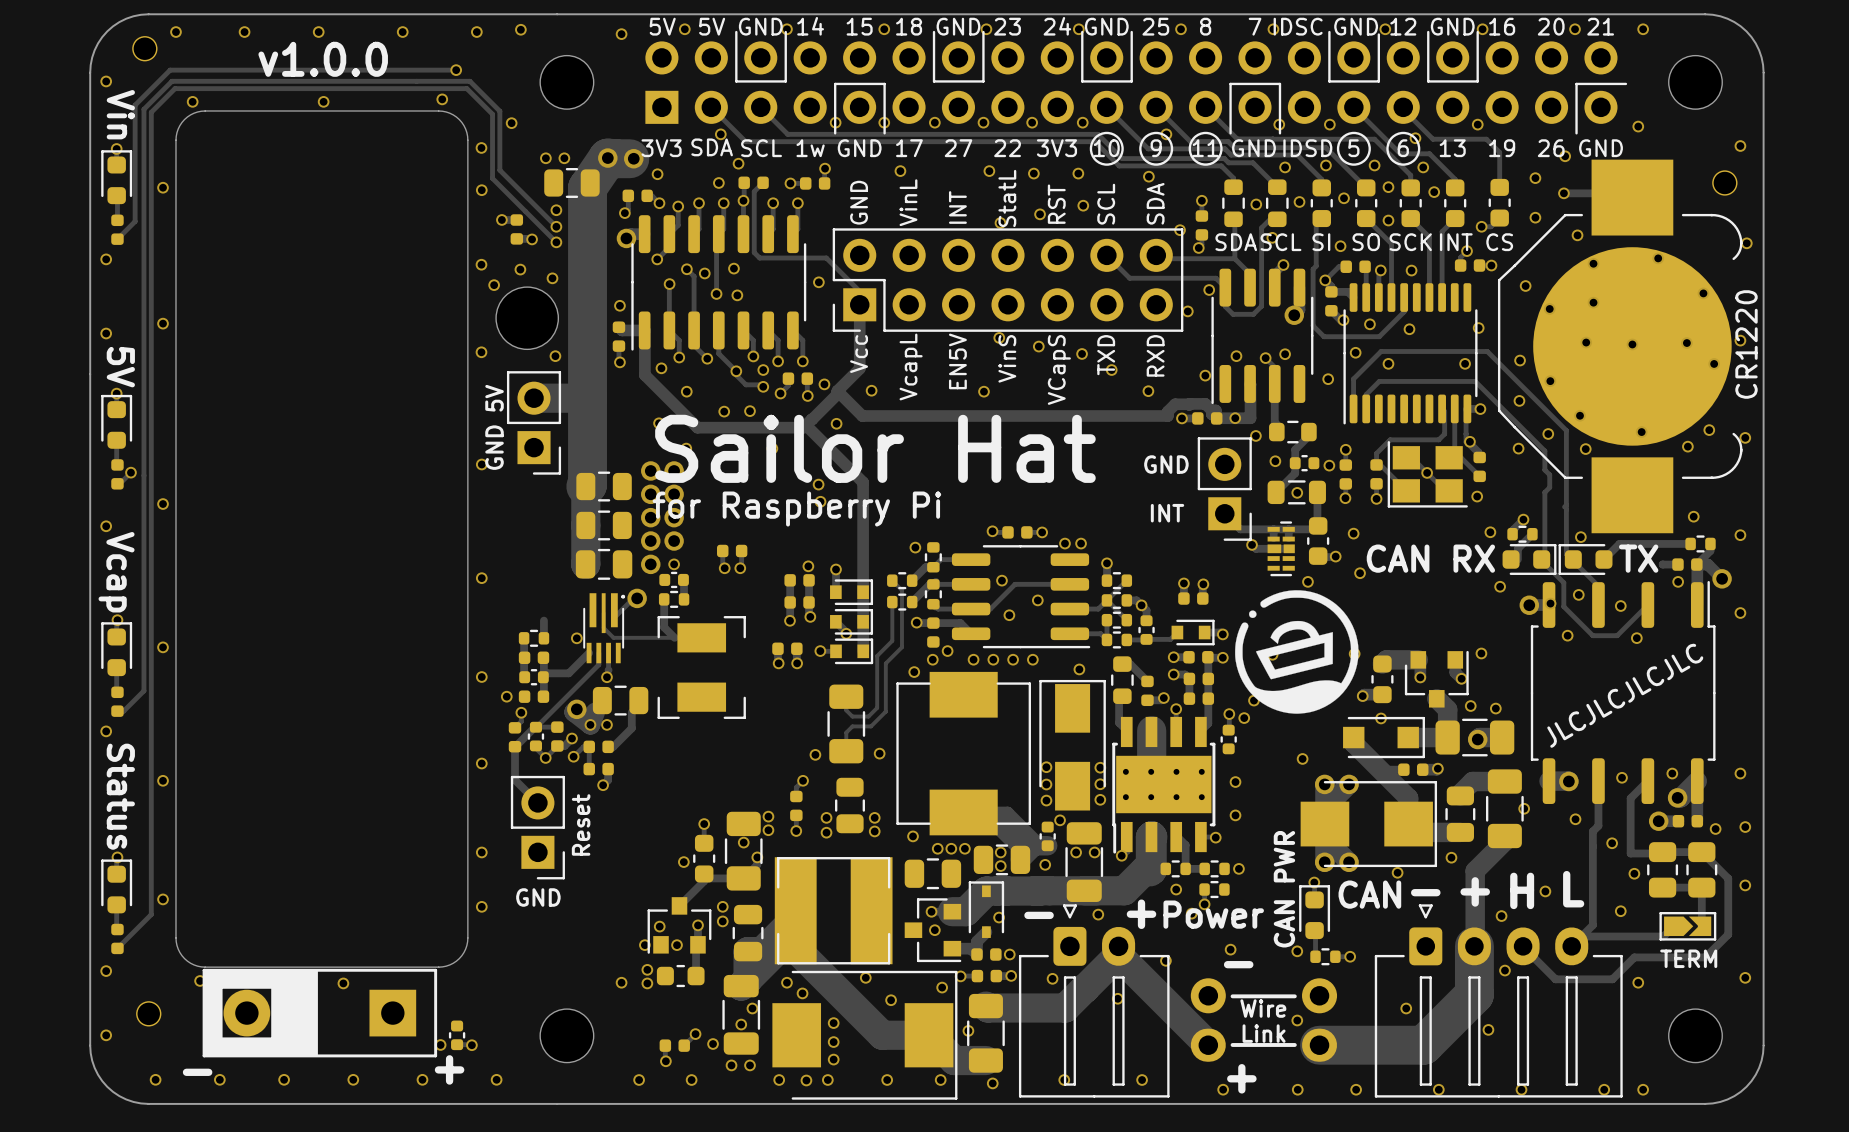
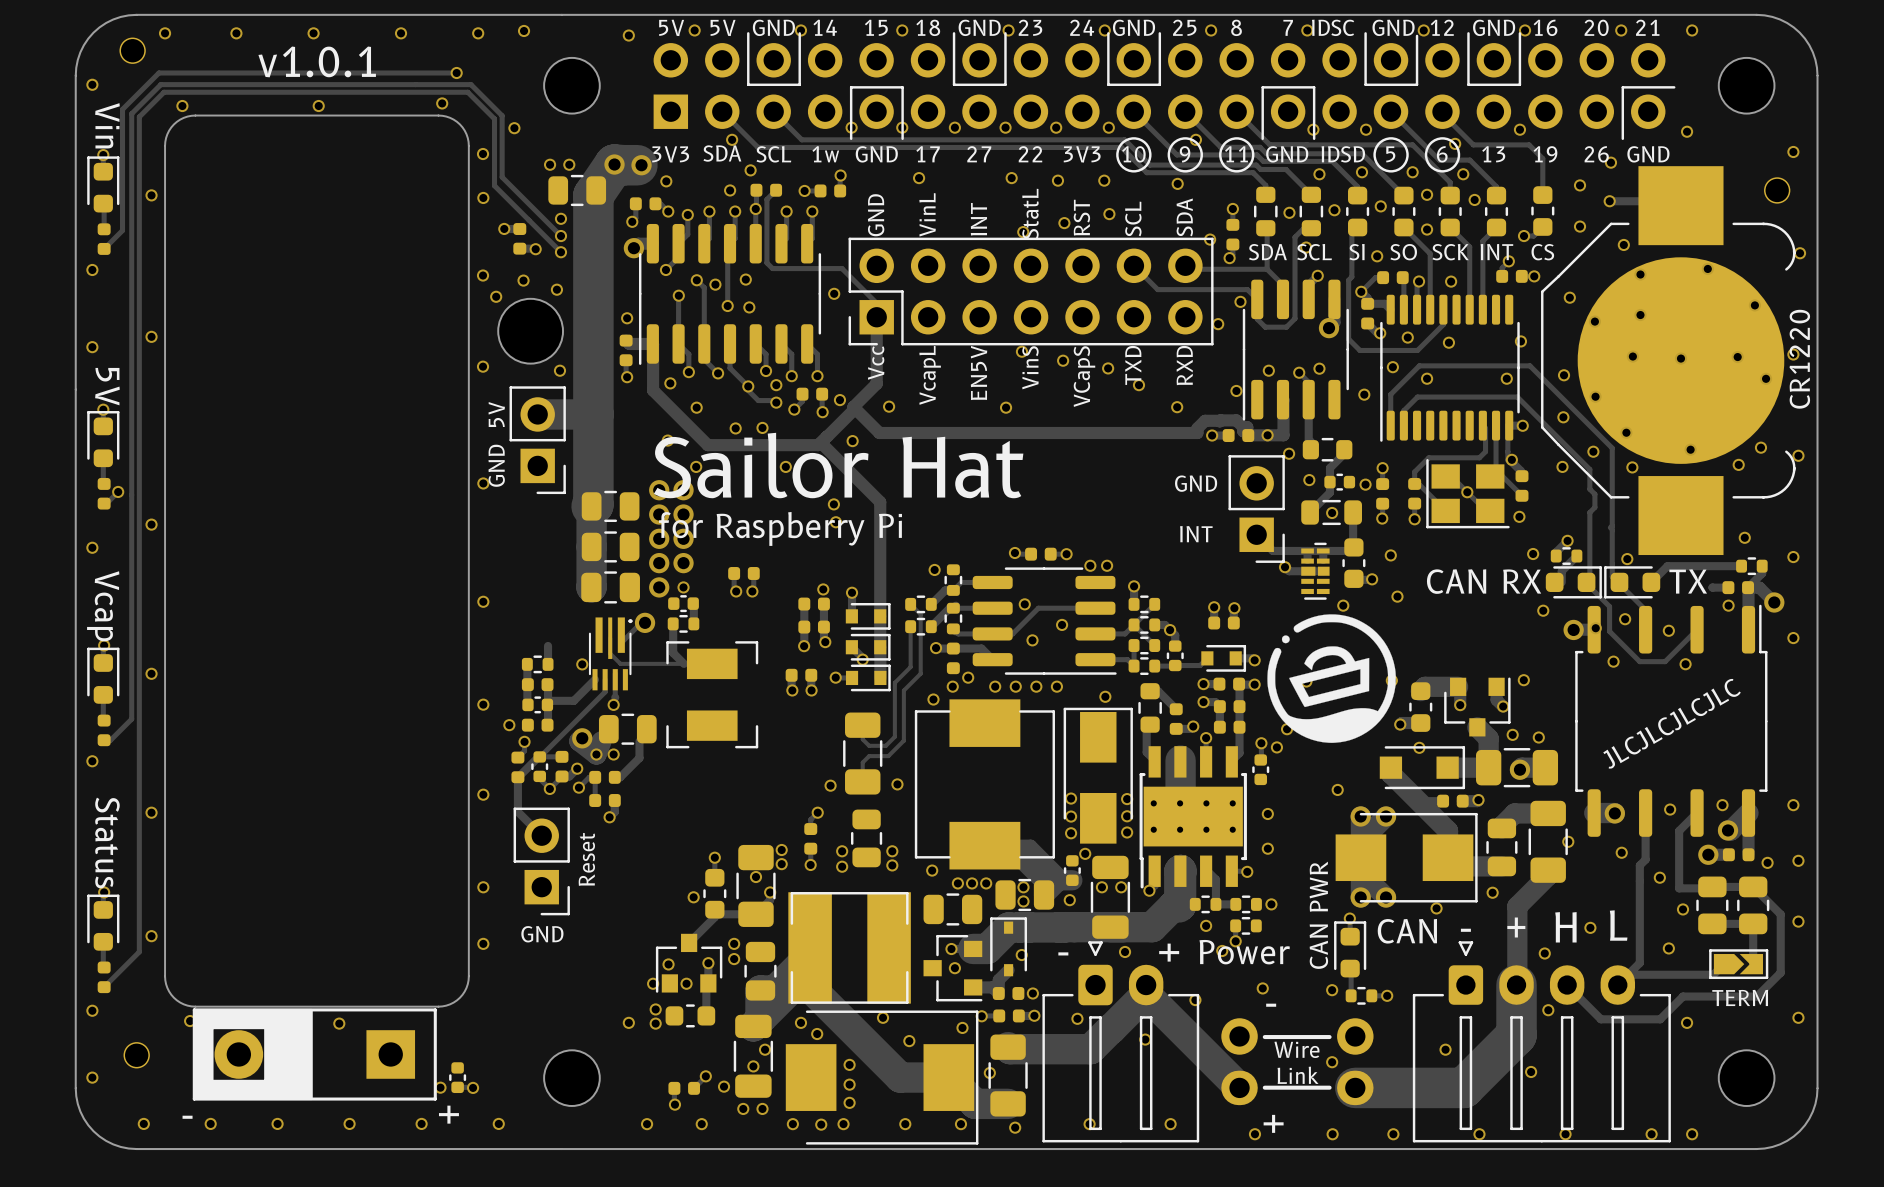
text: v1.0.0 (323, 59) -> v1.0.1 (317, 61)

